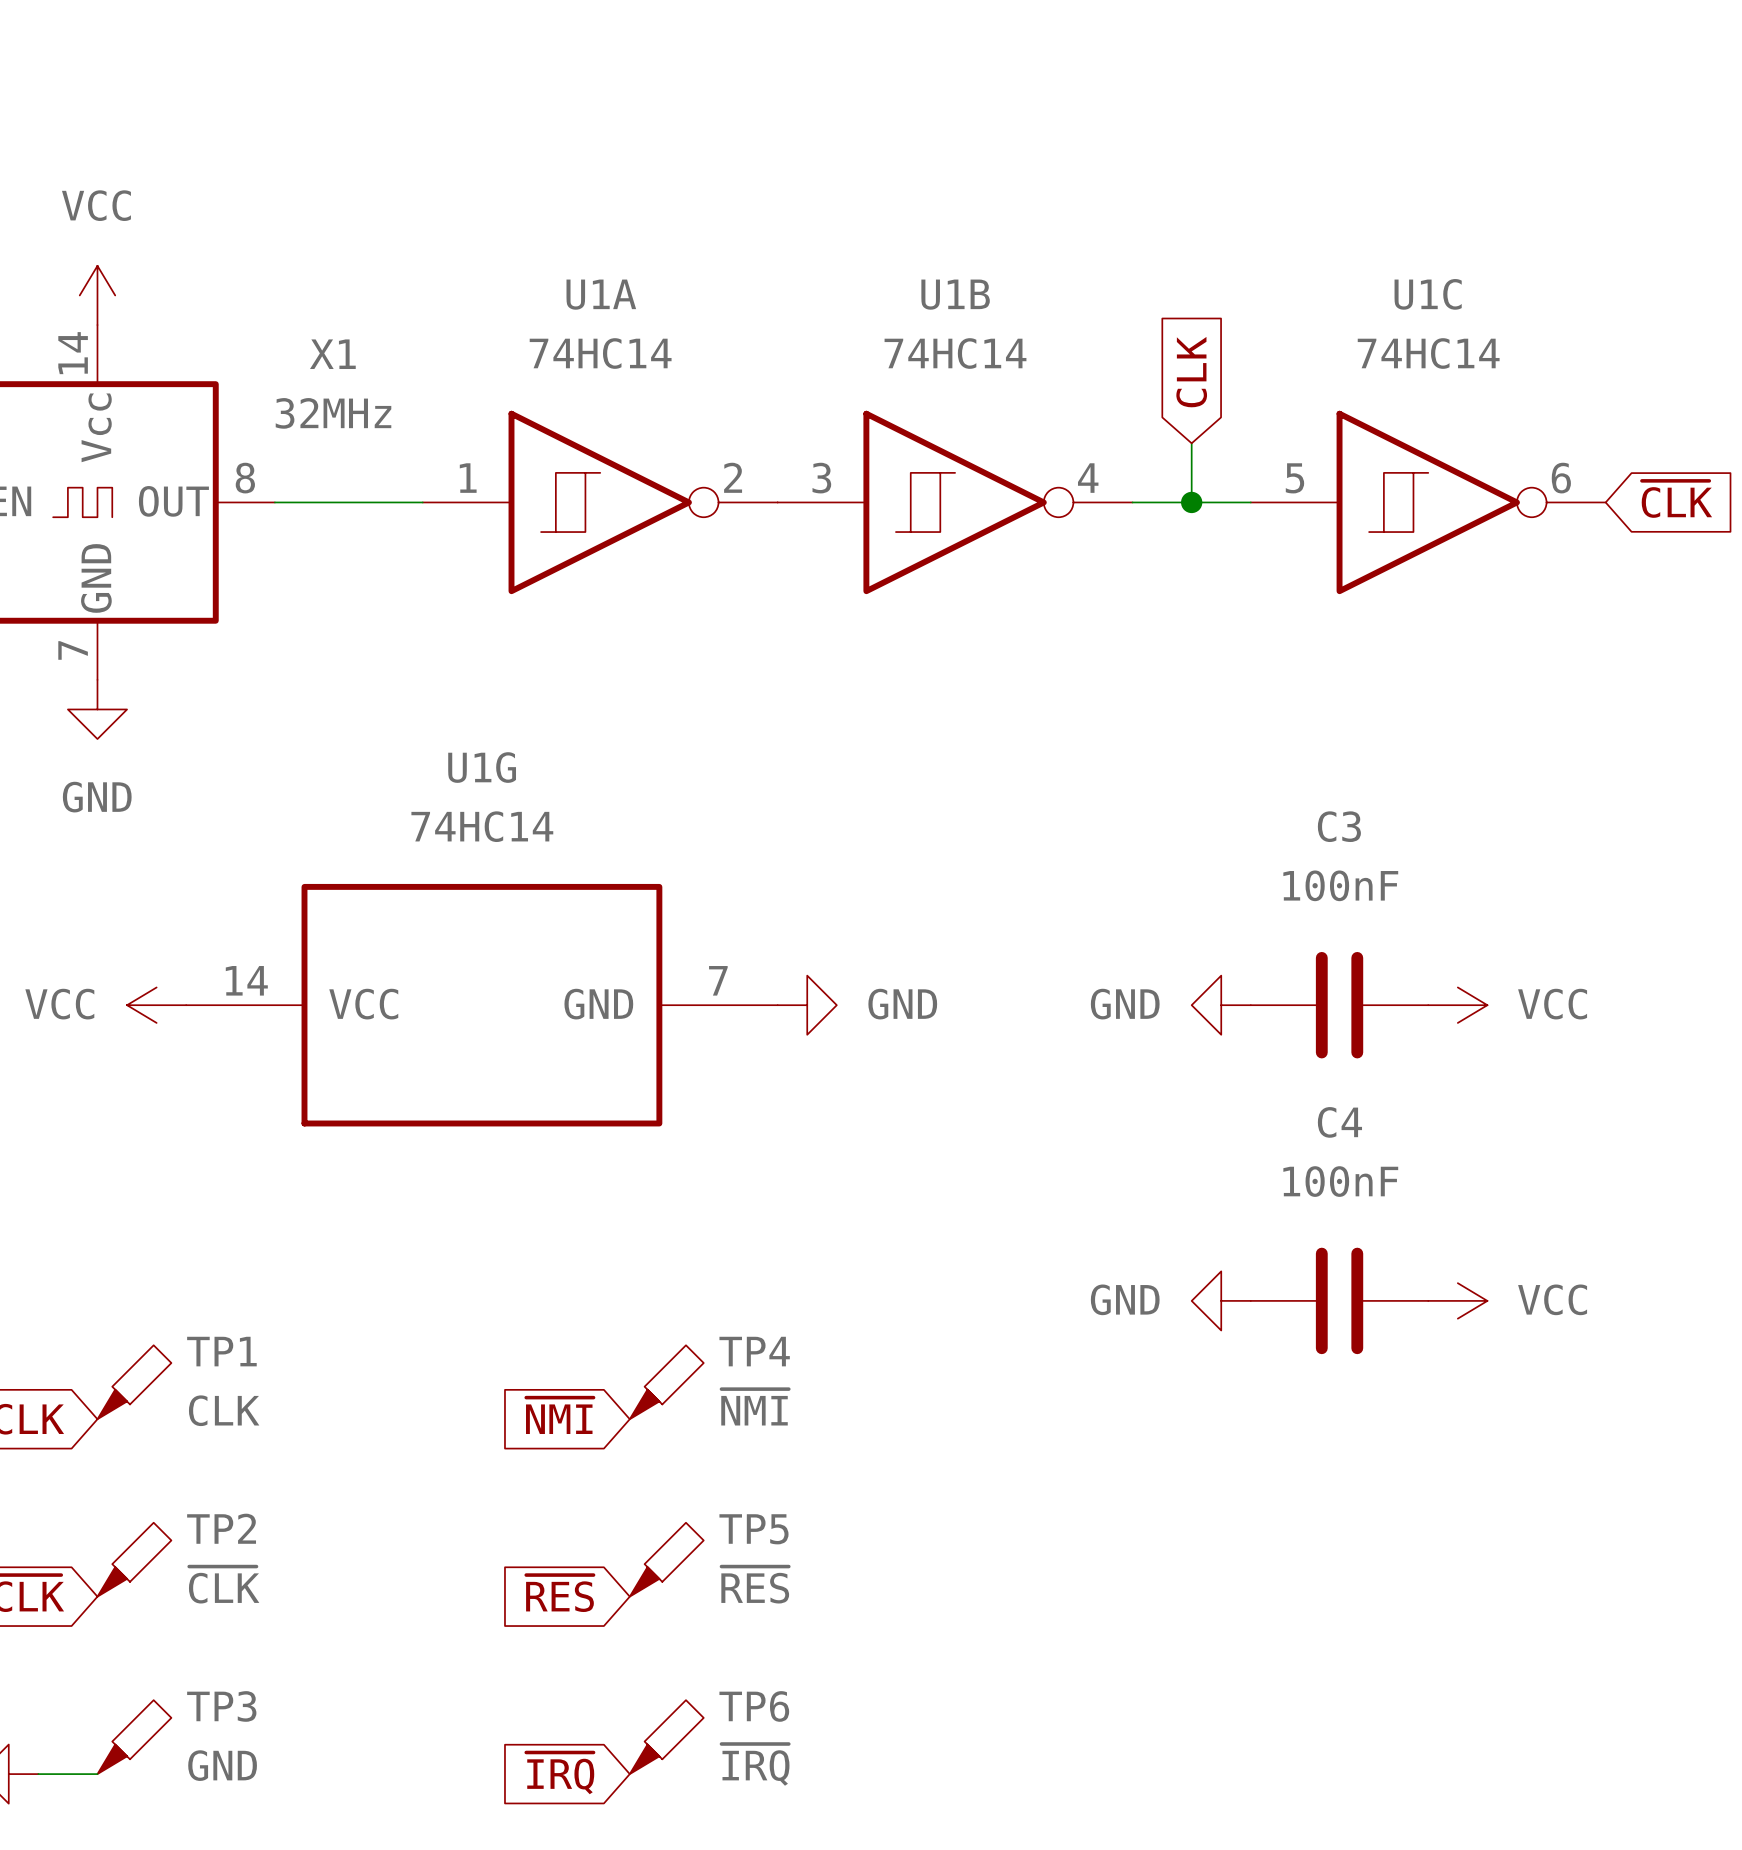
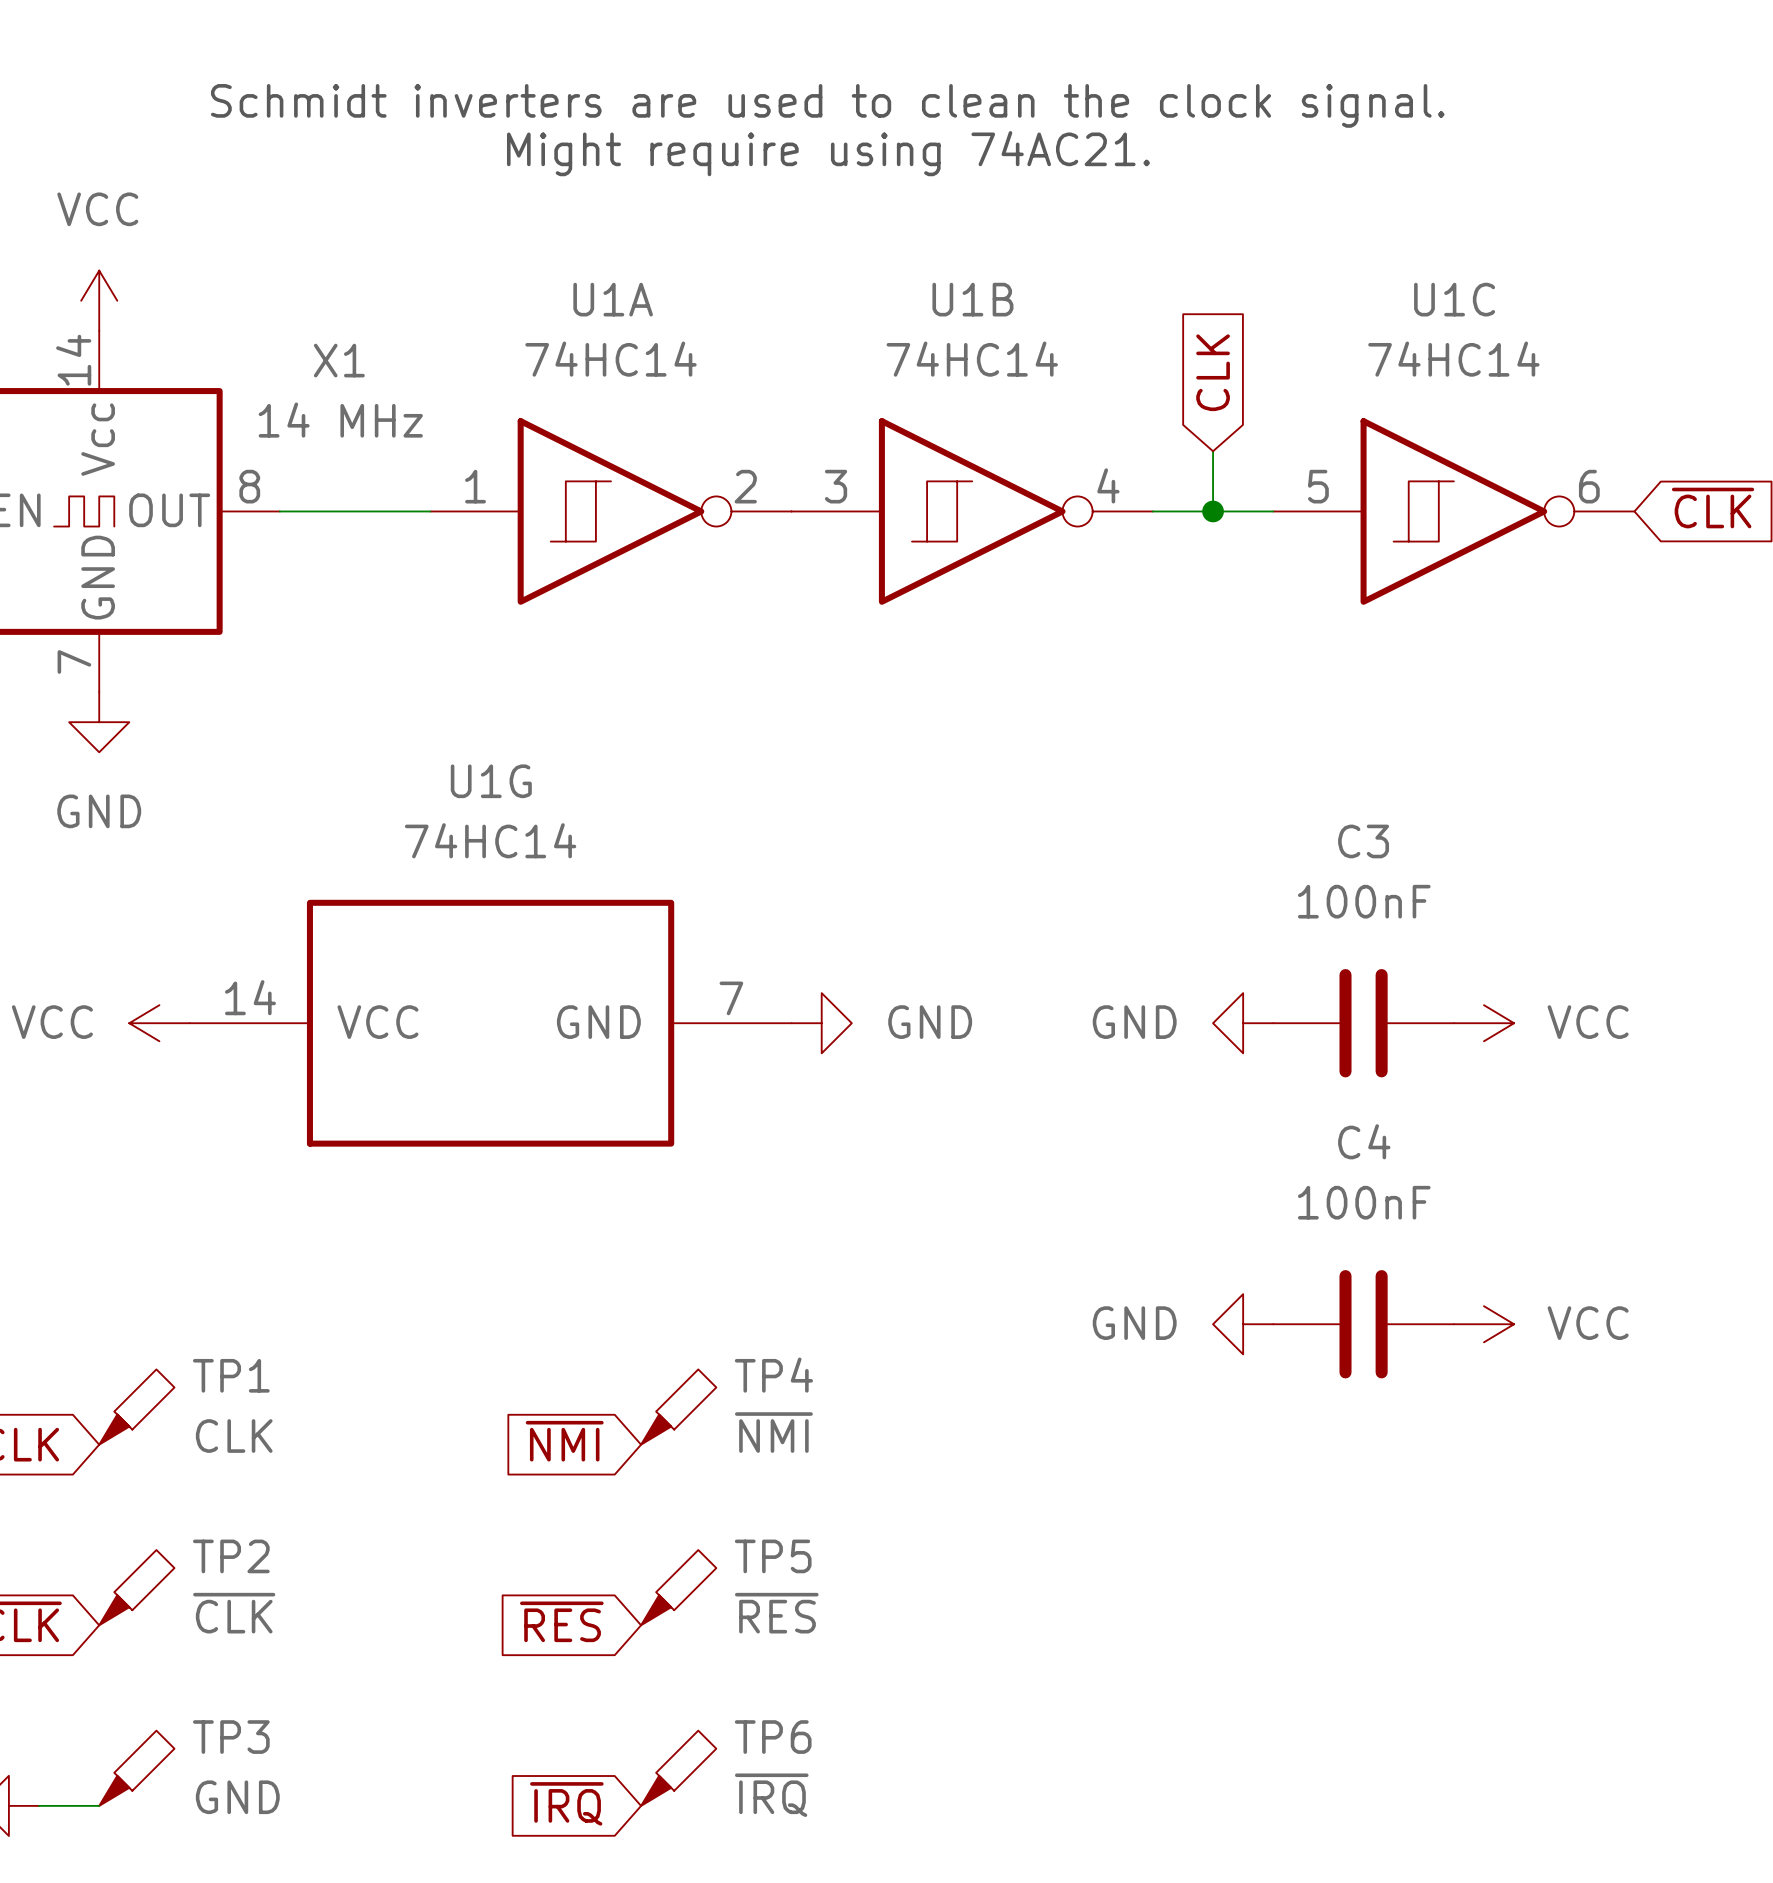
text: none -> Schmidt inverters are used to clean the clock signal. (827, 105)
text: none -> Might require using 74AC21. (828, 153)
X1 value: 32MHz (333, 413) -> 14 MHz (340, 420)

